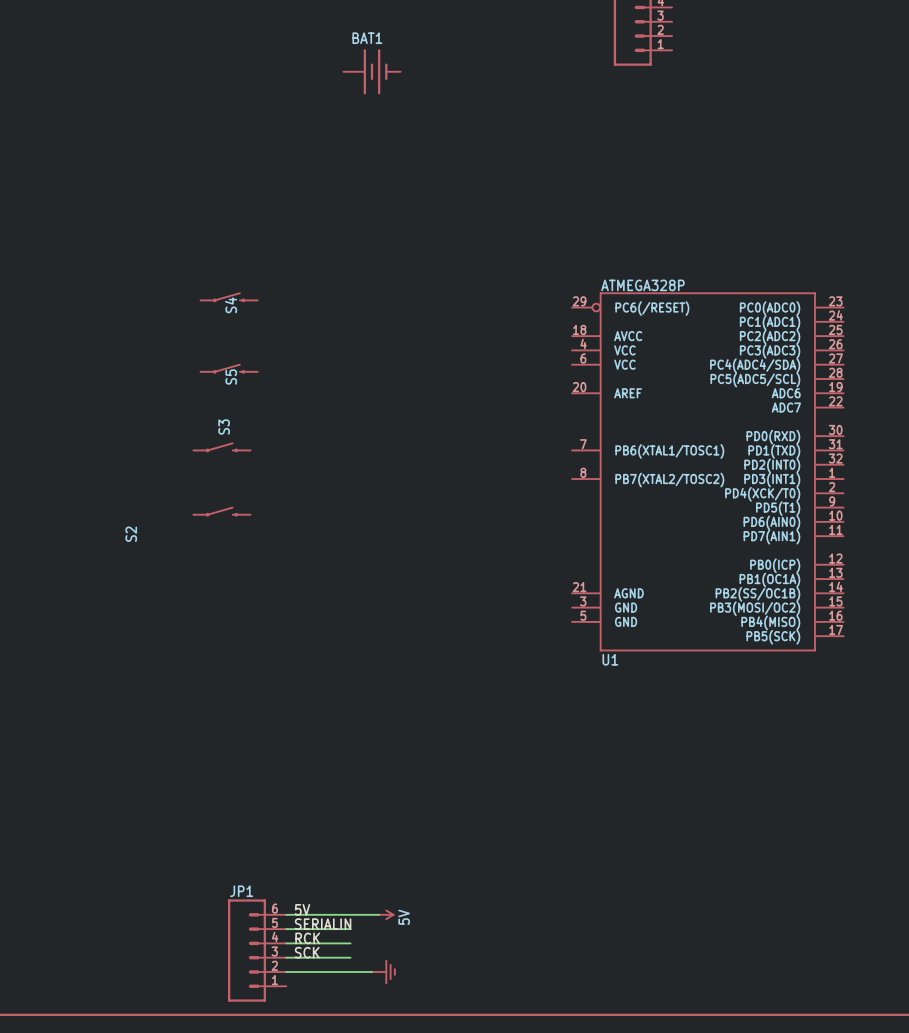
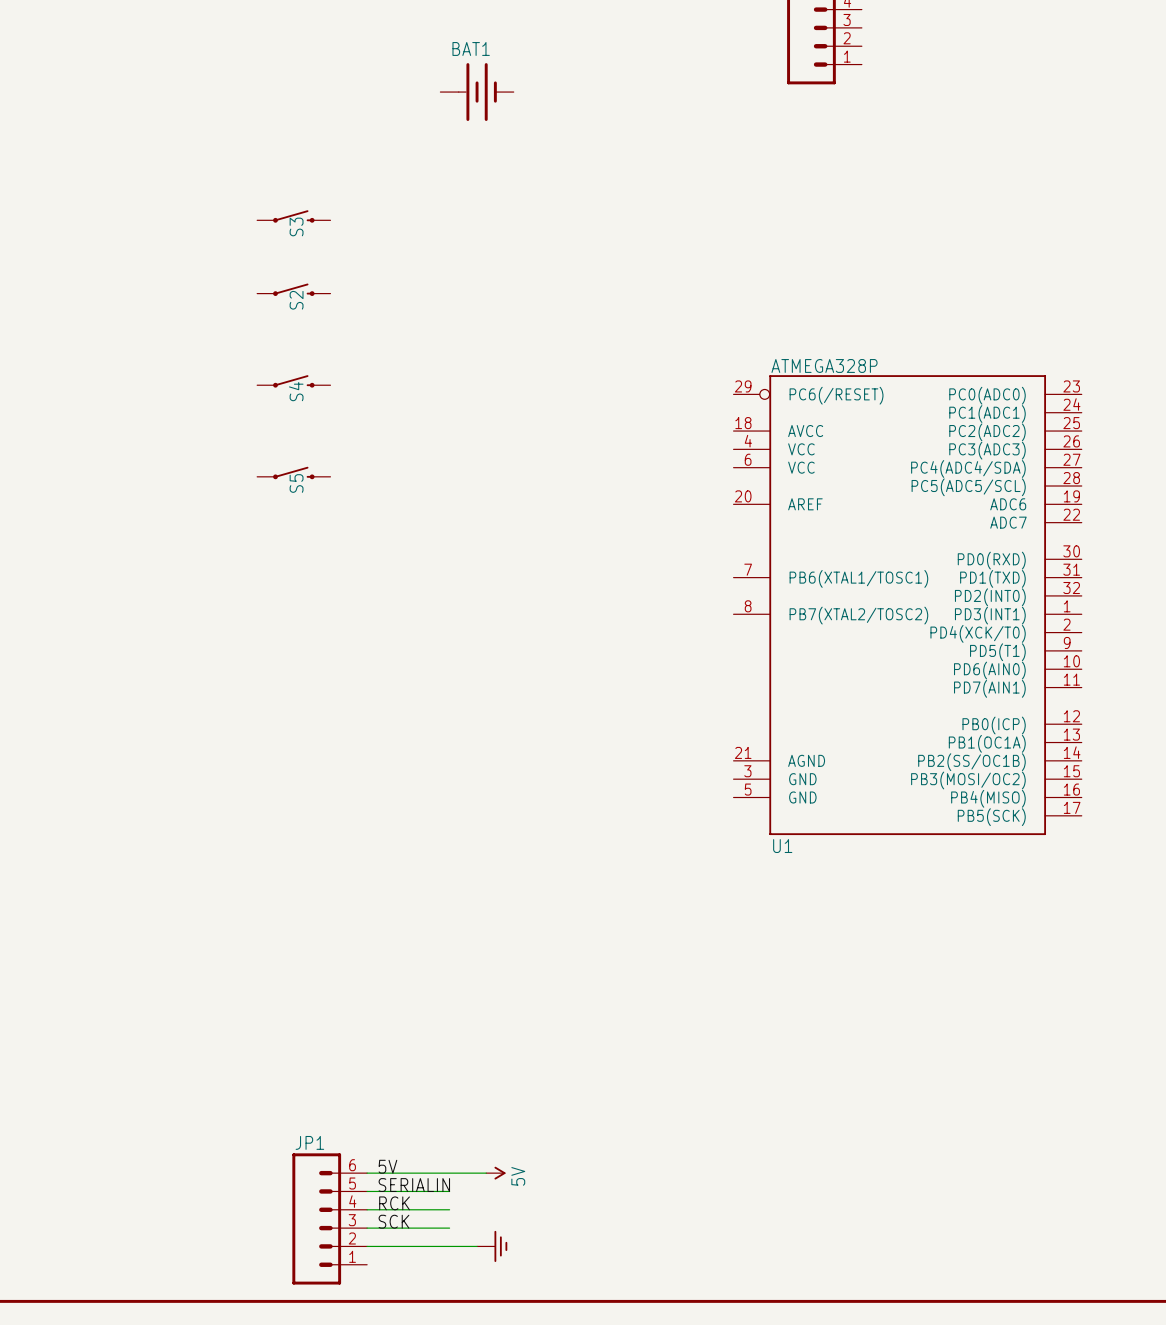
S3 name position: S3 (224, 427) -> S3 (296, 226)
S3 position: (221, 447) -> (293, 216)
S2 position: (221, 511) -> (293, 289)
S2 name position: S2 (131, 534) -> S2 (296, 300)

